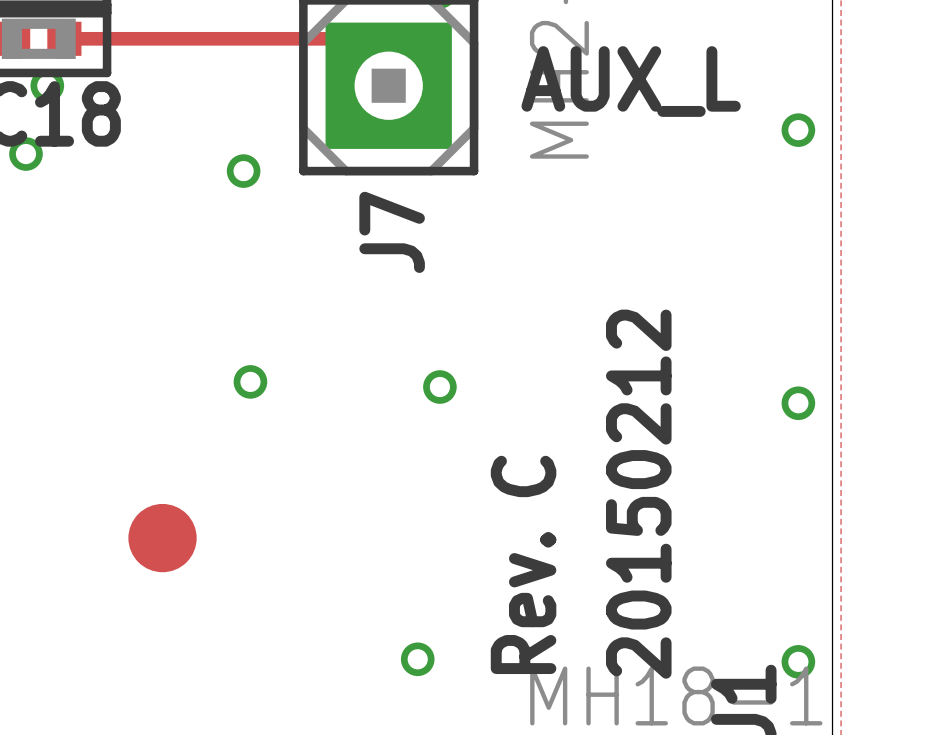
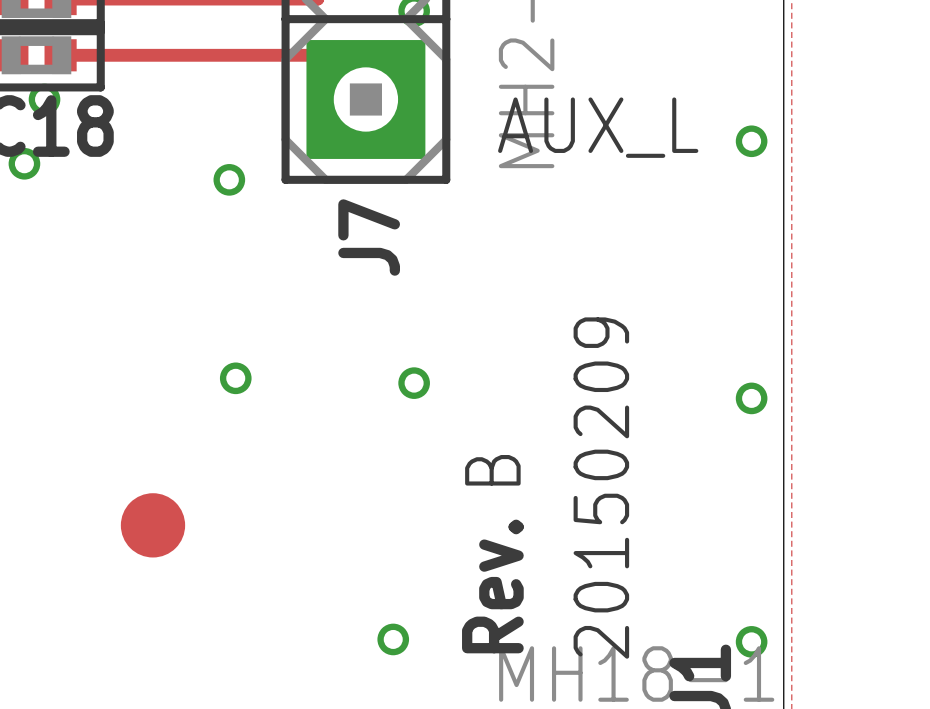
text position: AUX_L (631, 81) -> AUX_L (598, 127)
text: C (523, 476) -> B (492, 470)
text: 20150212 (638, 494) -> 20150209 (601, 488)

